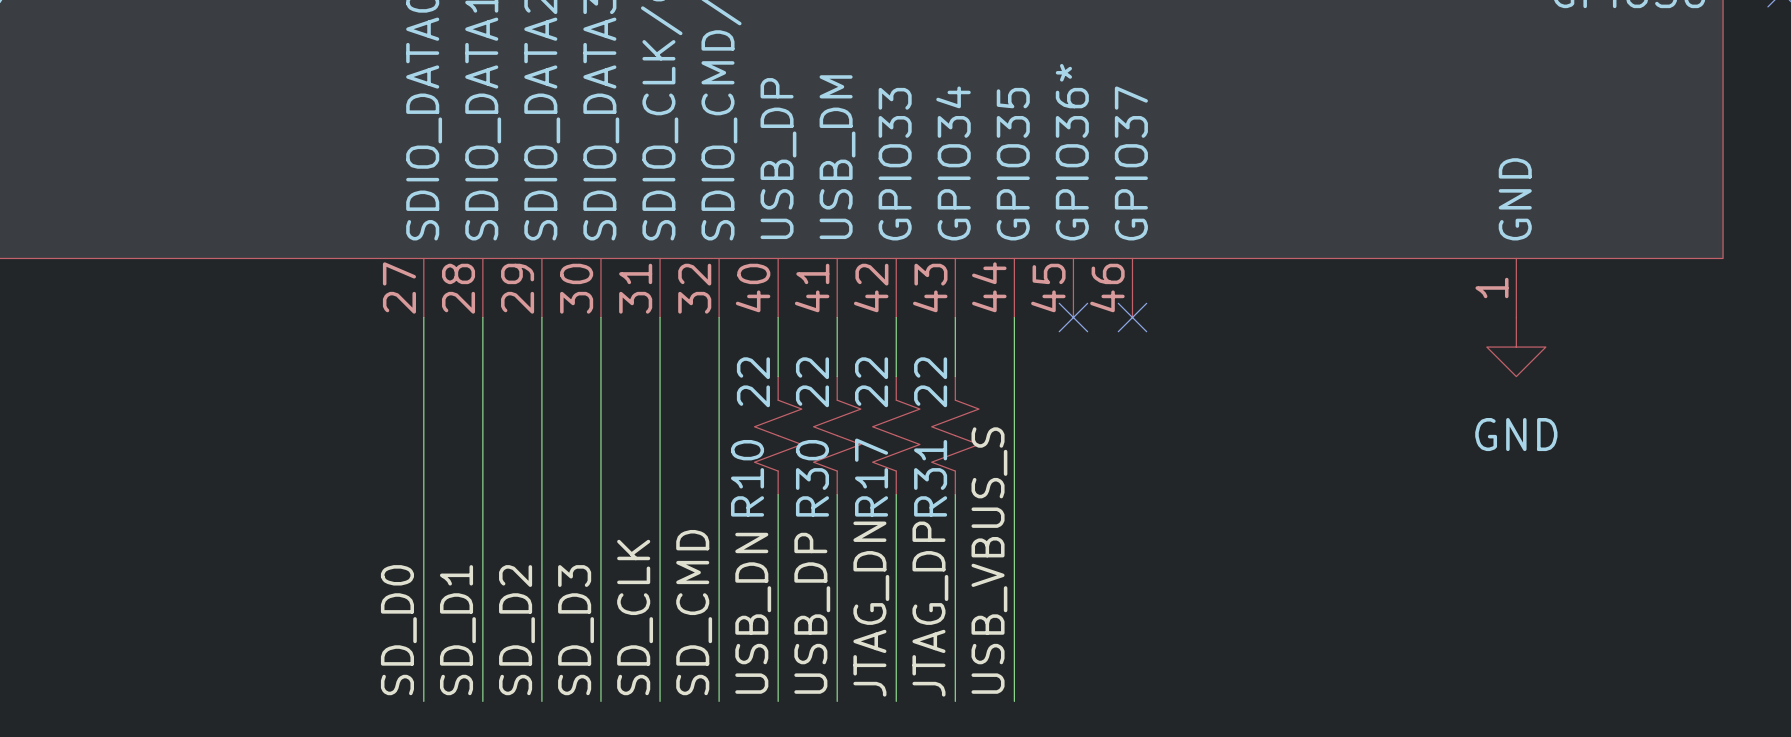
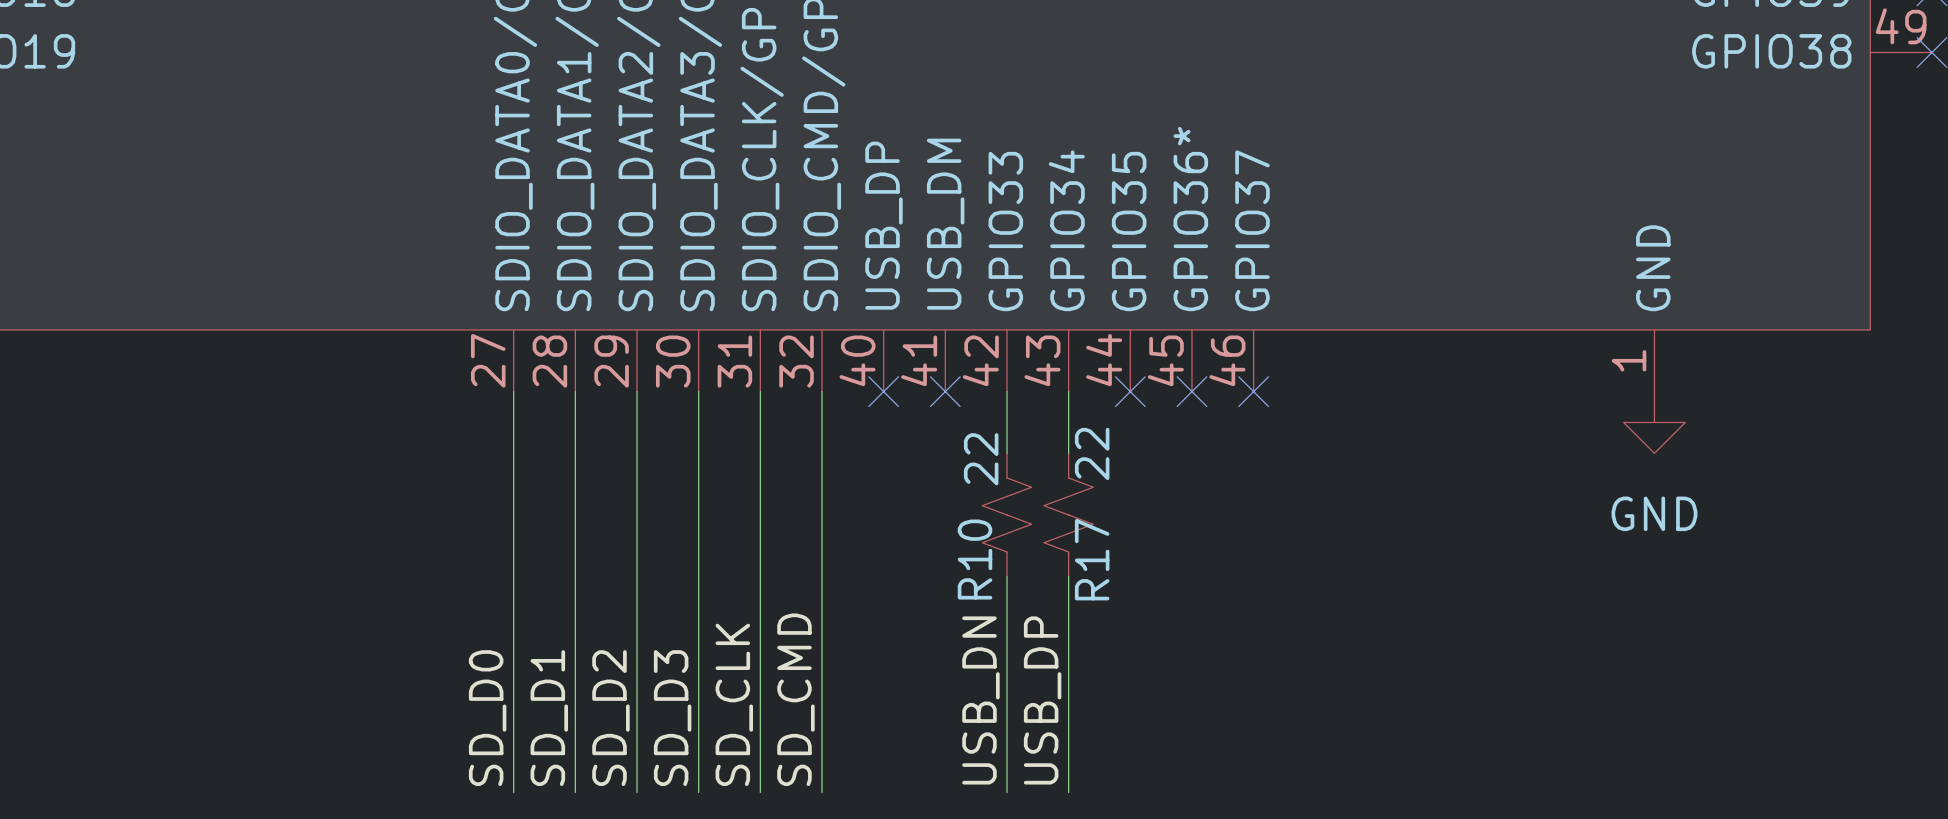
wire: (778, 317) (778, 376) -> none
no-connect mark: none -> (883, 391)
wire: (837, 317) (837, 376) -> none
no-connect mark: none -> (945, 391)
wire: (1014, 317) (1014, 701) -> none
no-connect mark: none -> (1130, 391)
R31 value position: 22 (930, 382) -> 22 (1092, 453)
R10: 22 (778, 435) -> none
R17: 22 (837, 435) -> none
R30 name: R30 (812, 478) -> R10 (975, 559)
R31 name: R31 (930, 478) -> R17 (1092, 559)
wire: (778, 494) (778, 701) -> none
wire: (837, 494) (837, 701) -> none
label: USB_VBUS_S (989, 560) -> none
label: JTAG_DN (871, 609) -> USB_DN (980, 700)
label: JTAG_DP (930, 609) -> USB_DP (1042, 700)
label: USB_DN (753, 613) -> none
label: USB_DP (812, 613) -> none

